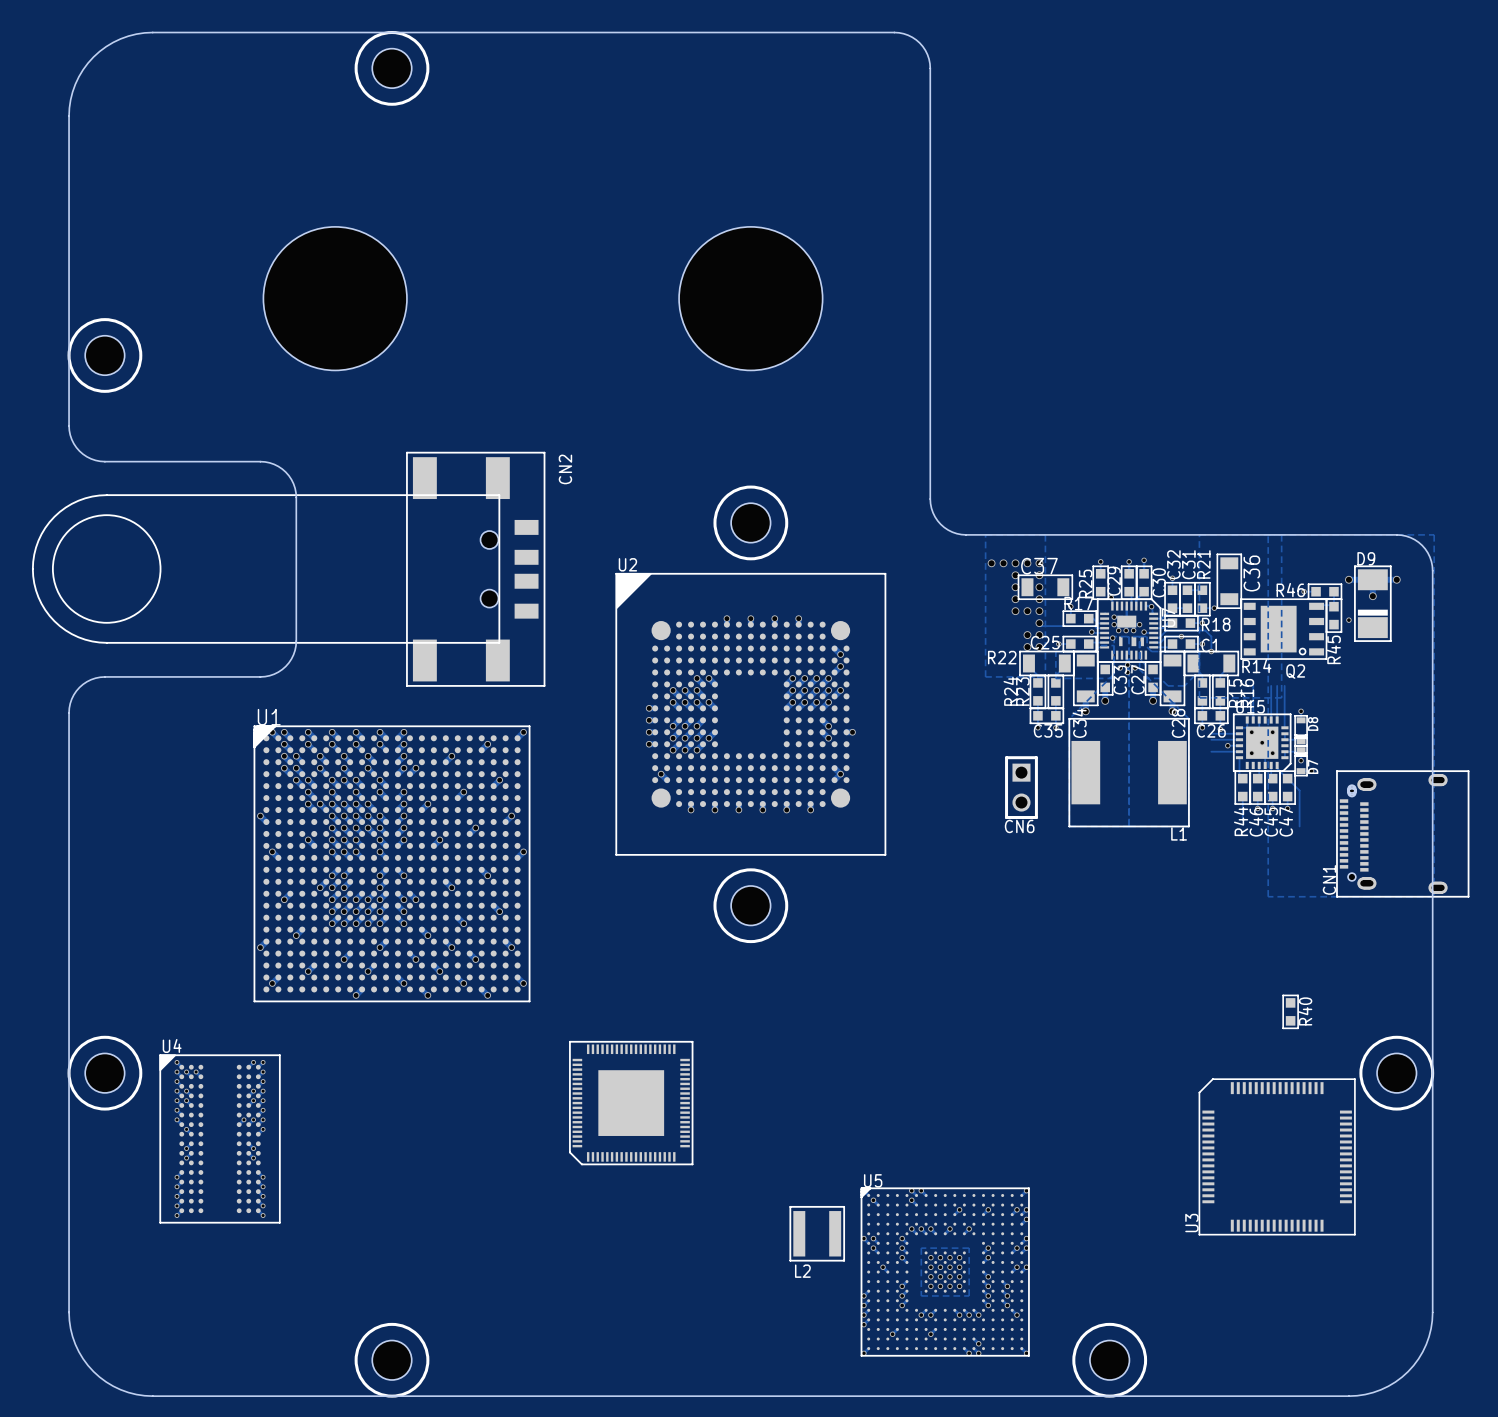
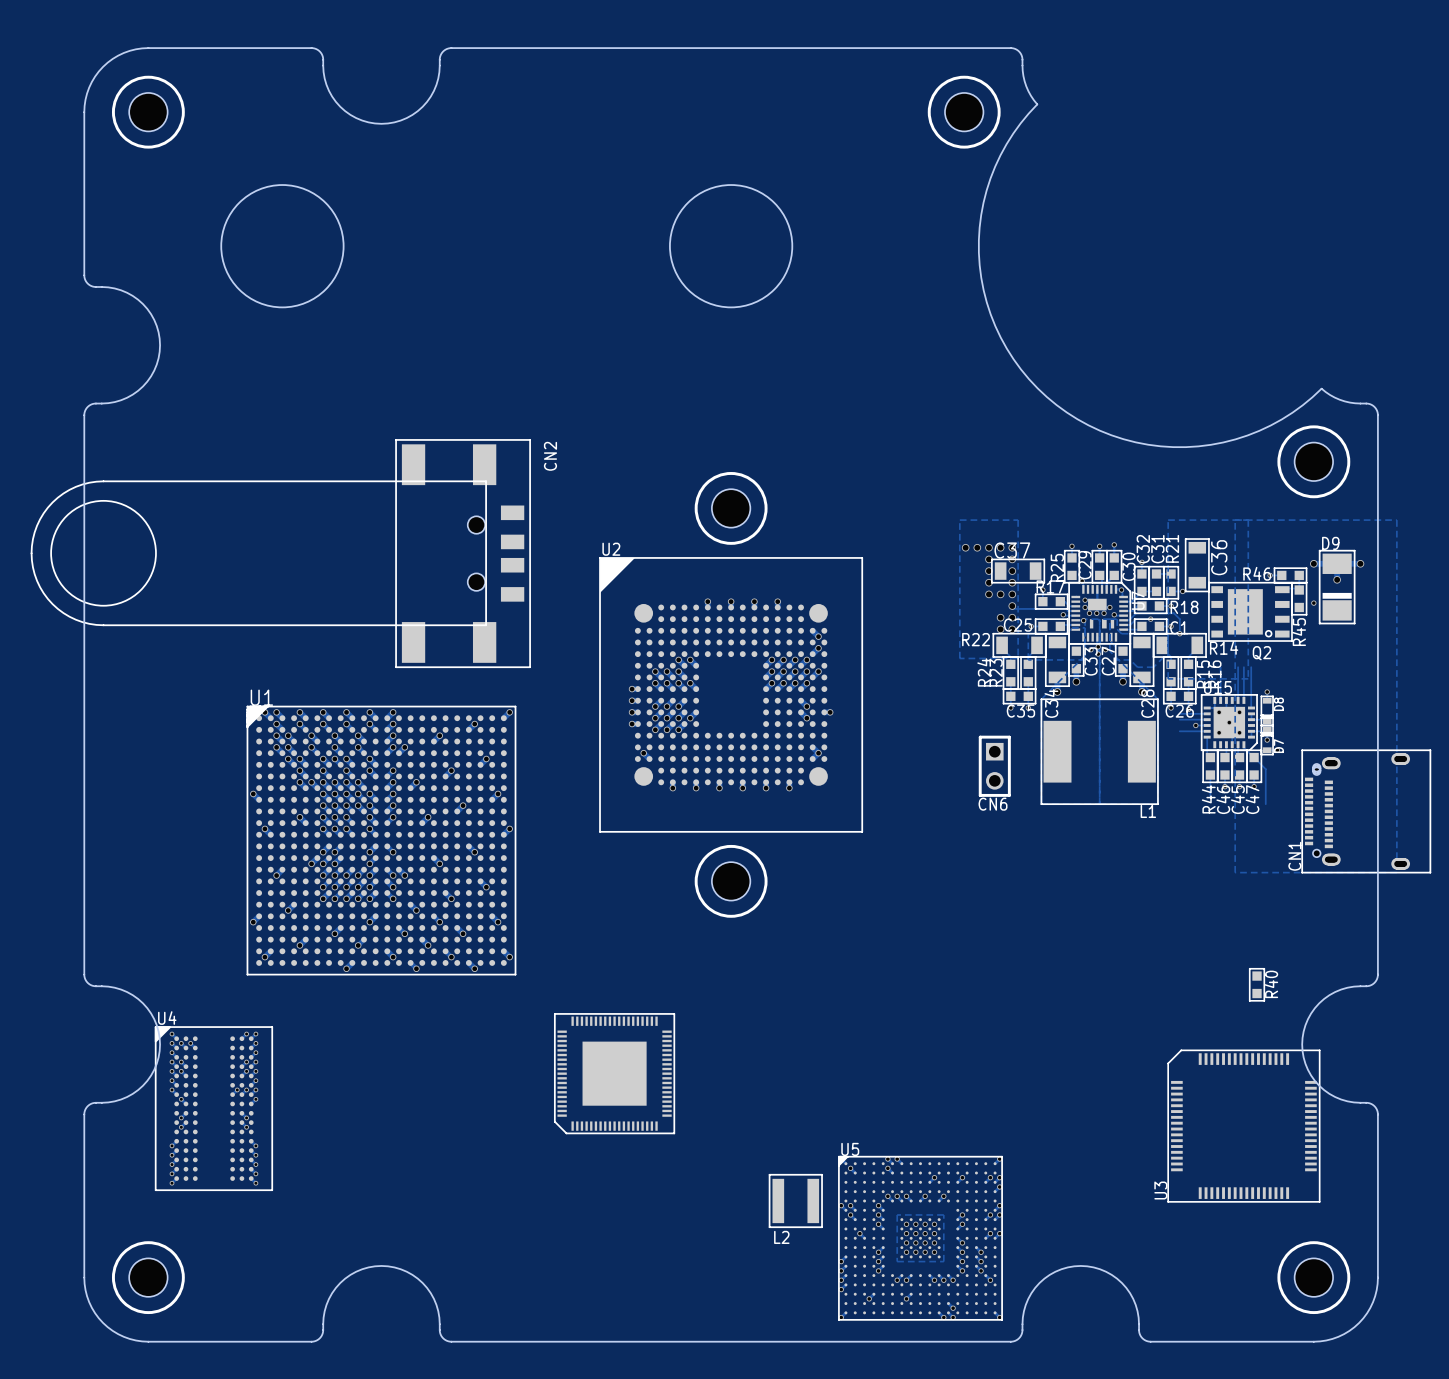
board edge: (152, 32) (894, 32) (908, 35) (922, 46) (929, 63) (930, 499) (933, 512) (940, 524) (952, 532) (966, 534) (1396, 534) (1410, 537) (1422, 545) (1429, 557) (1432, 570) (1432, 1312) (1431, 1328) (1426, 1344) (1418, 1358) (1408, 1371) (1395, 1382) (1380, 1389) (1365, 1394) (1348, 1396) (152, 1396) (136, 1394) (120, 1389) (106, 1382) (93, 1371) (83, 1358) (75, 1344) (70, 1328) (69, 1312) (70, 703) (76, 690) (83, 684) (100, 677) (269, 675) (282, 669) (288, 662) (295, 650) (296, 641) (296, 497) (293, 483) (285, 472) (274, 464) (260, 461) (100, 461) (83, 454) (76, 447) (70, 435) (69, 116) (70, 99) (75, 84) (83, 69) (99, 51) (120, 38) (136, 34) (152, 32) -> (148, 48) (123, 52) (103, 66) (89, 87) (84, 112) (84, 278) (91, 286) (121, 290) (138, 299) (154, 319) (160, 345) (156, 364) (142, 386) (121, 400) (91, 404) (86, 408) (84, 415) (84, 976) (86, 981) (91, 985) (121, 989) (142, 1003) (156, 1025) (160, 1044) (154, 1069) (138, 1090) (121, 1099) (91, 1103) (84, 1111) (84, 1283) (91, 1307) (103, 1322) (118, 1334) (142, 1341) (314, 1341) (322, 1334) (326, 1304) (335, 1287) (356, 1271) (381, 1265) (400, 1269) (422, 1283) (436, 1304) (440, 1334) (444, 1339) (451, 1341) (1012, 1341) (1017, 1339) (1021, 1334) (1025, 1304) (1039, 1283) (1061, 1269) (1080, 1265) (1106, 1271) (1126, 1287) (1135, 1304) (1139, 1334) (1147, 1341) (1320, 1341) (1344, 1334) (1359, 1322) (1370, 1307) (1377, 1283) (1377, 1111) (1370, 1103) (1341, 1099) (1324, 1090) (1307, 1069) (1302, 1044) (1305, 1025) (1319, 1003) (1341, 989) (1370, 985) (1375, 981) (1377, 976) (1377, 415) (1374, 406) (1369, 403) (1339, 399) (1321, 388) (1302, 405) (1281, 419) (1247, 435) (1210, 444) (1173, 447) (1135, 442) (1099, 430) (1066, 412) (1037, 388) (1013, 359) (995, 326) (983, 290) (979, 265) (979, 227) (983, 202) (990, 178) (1006, 144) (1020, 123) (1037, 104) (1024, 81) (1021, 55) (1013, 48) (449, 48) (444, 50) (440, 55) (436, 84) (422, 106) (400, 120) (381, 123) (356, 118) (335, 101) (326, 84) (322, 55) (314, 48) (148, 48)
part: (392, 68) -> none
part: none -> (148, 112)
part: none -> (964, 112)
round board edge: none -> [220, 184, 345, 309]
round board edge: none -> [669, 184, 794, 309]
hole: (335, 298) -> none
hole: (750, 298) -> none
part: (104, 355) -> none
part: none -> (1313, 461)
part: (104, 1073) -> none
part: (1396, 1073) -> none
part: none -> (148, 1277)
part: none -> (1313, 1277)
part: (392, 1360) -> none
part: (1109, 1360) -> none

